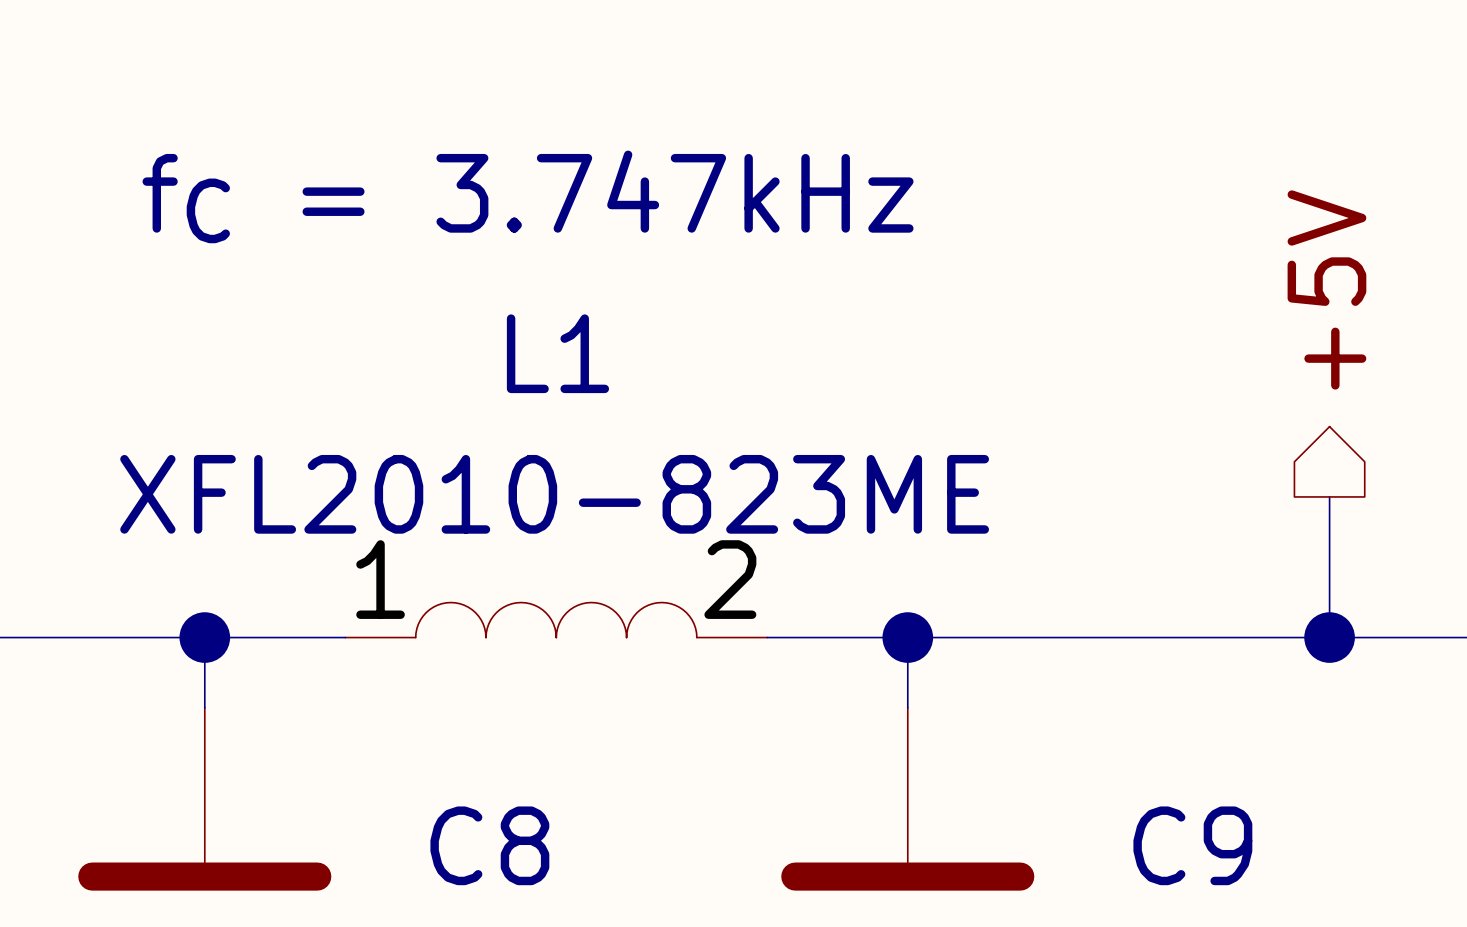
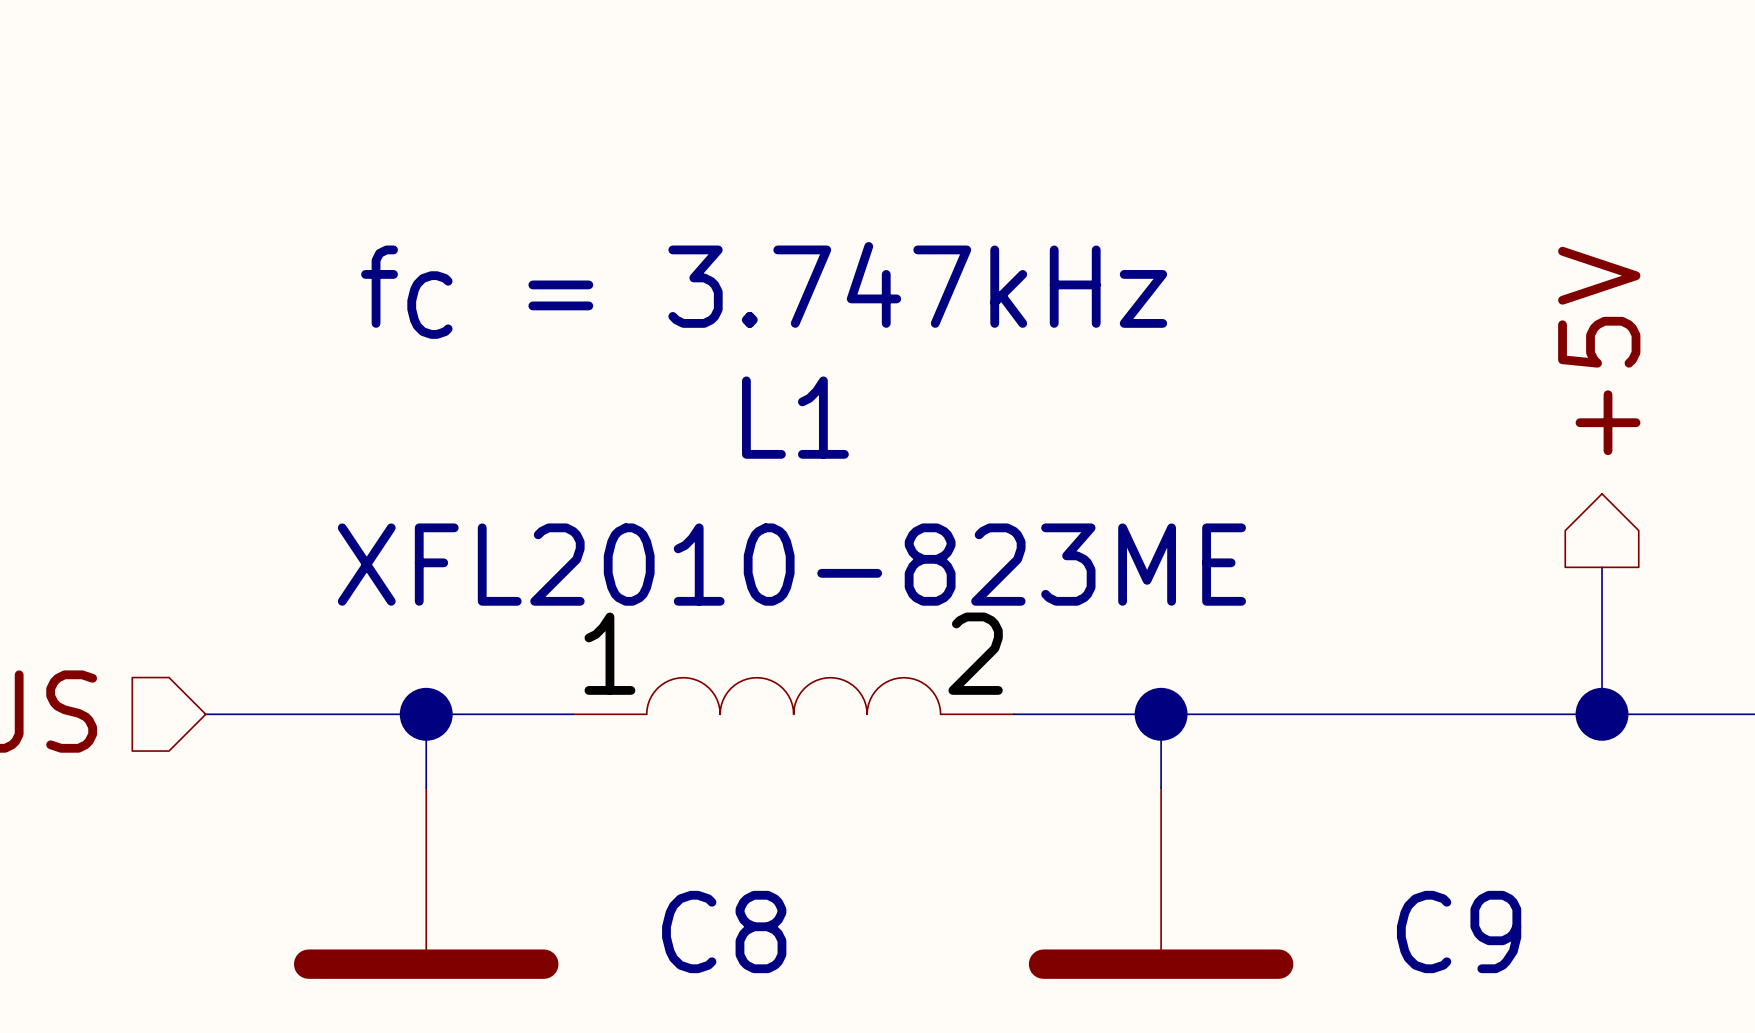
text position: fC = 3.747kHz (528, 196) -> fC = 3.747kHz (764, 290)

